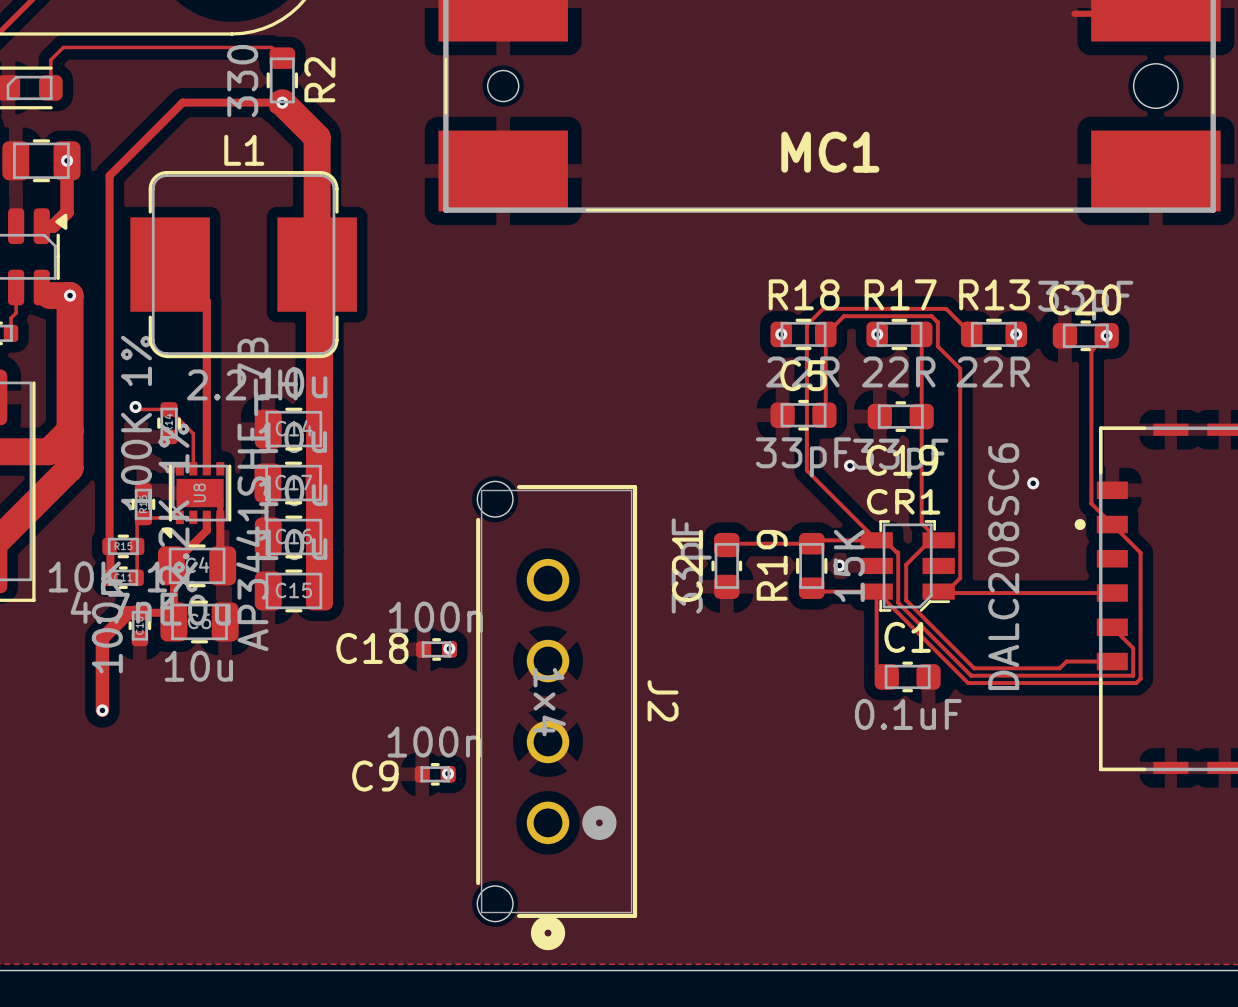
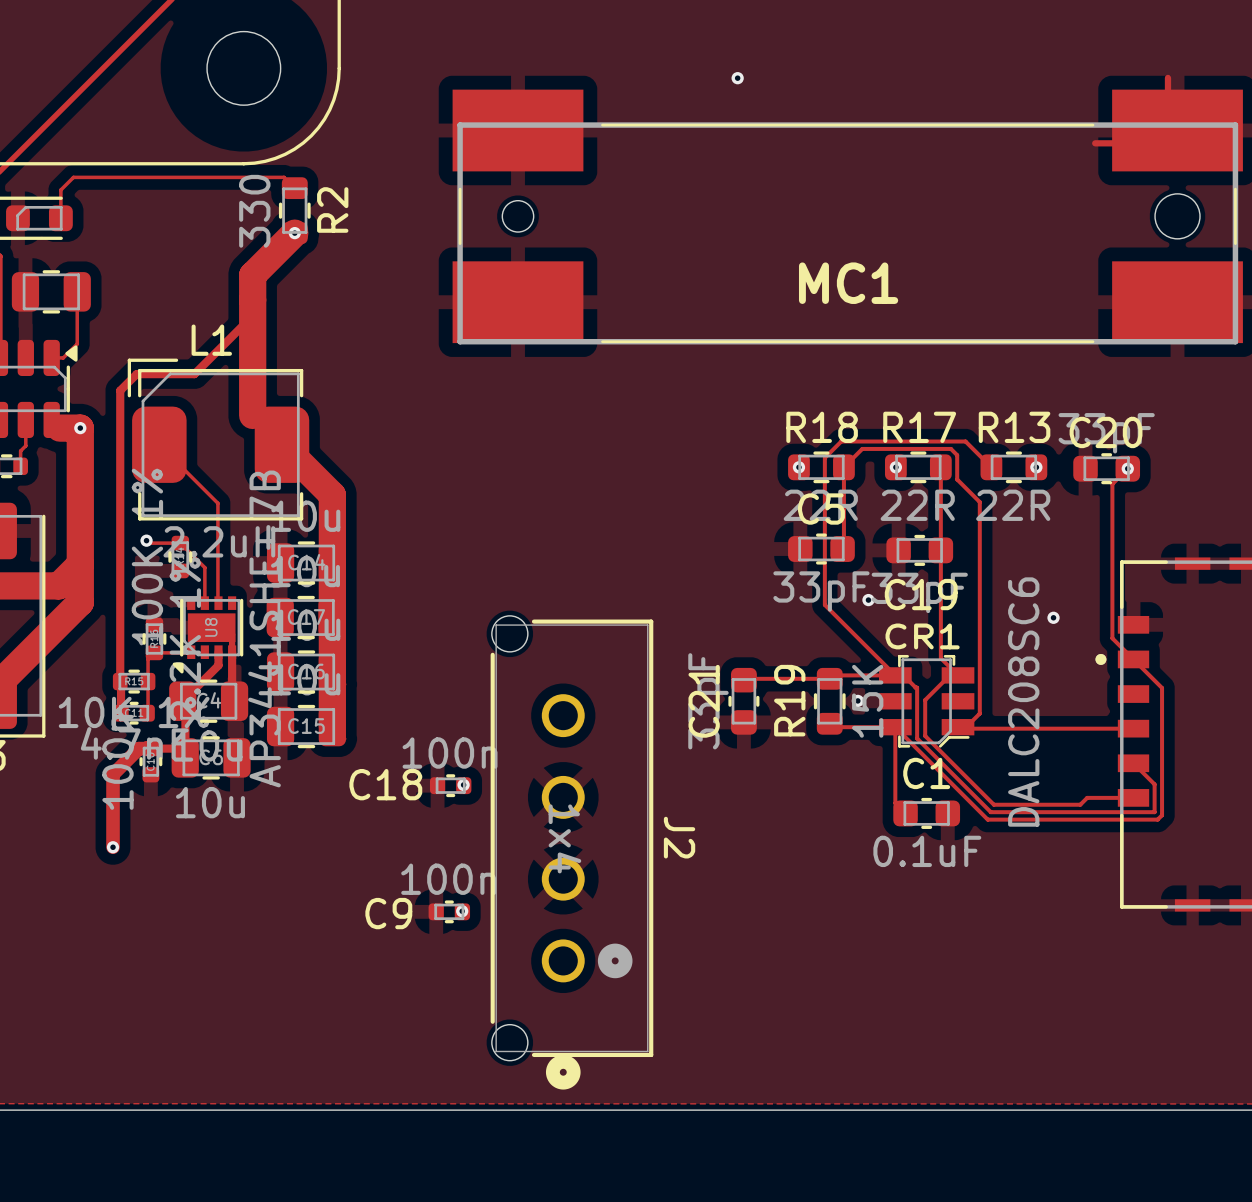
track: none -> (294, 233) (252, 275) (252, 415) (332, 495)
track width: thick (67, 160) (67, 212) (53, 226) (41, 226) -> thin (77, 291) (77, 343) (63, 357) (51, 357)
via: (67, 160) -> none
L1 footprint: [130, 171, 357, 359] -> [127, 358, 310, 521]
track: (109, 258) (109, 175) (182, 102) (282, 102) (317, 137) (319, 361) -> (120, 390) (136, 374) (194, 374) (252, 315)
track: (170, 264) (206, 301) (206, 468) -> (159, 444) (217, 503) (217, 602)

